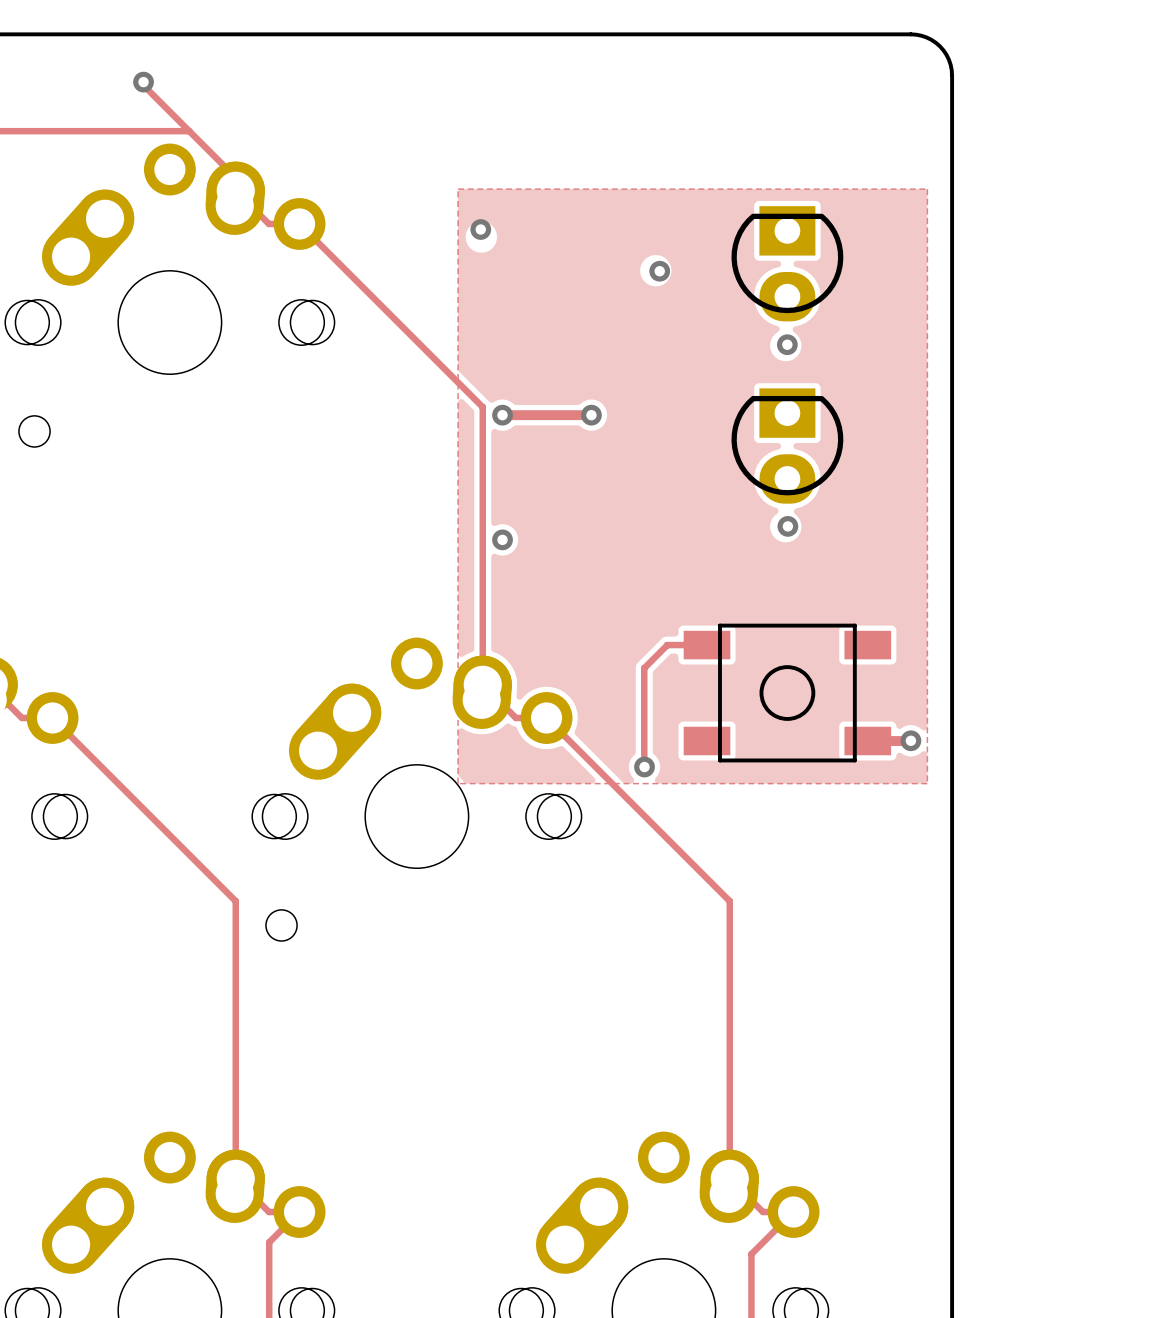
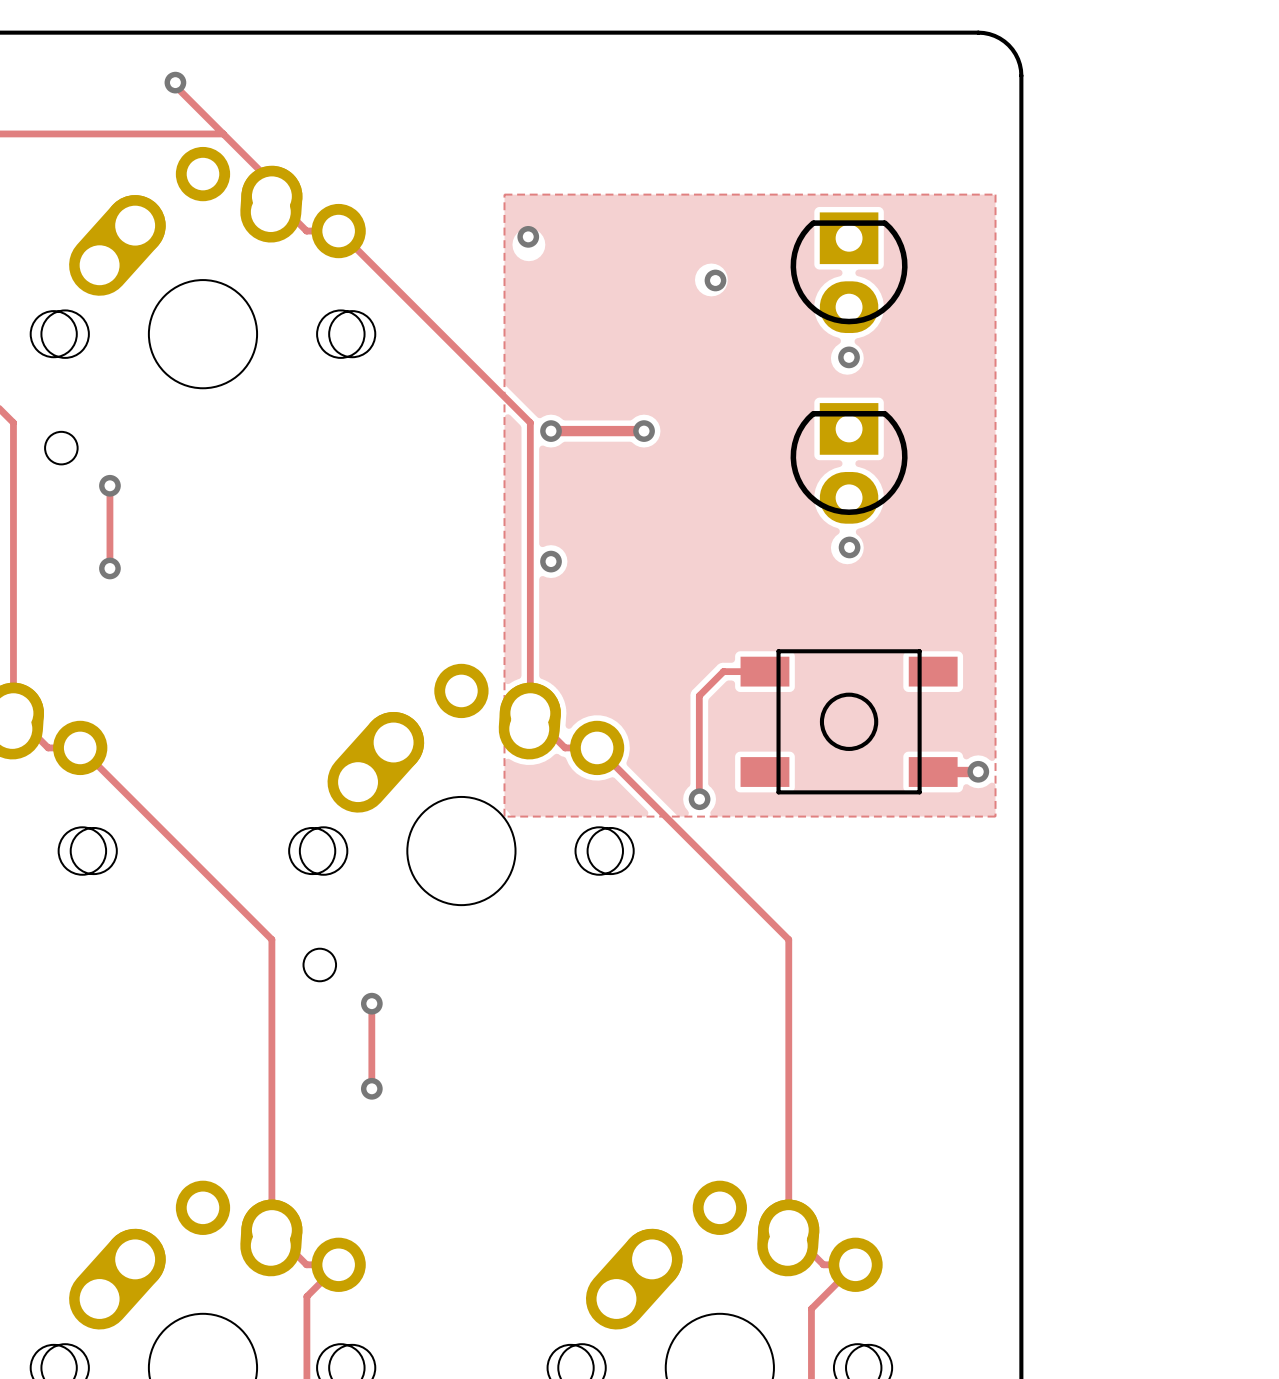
track: none -> (109, 485) (109, 568)
via: none -> (109, 485)
via: none -> (109, 568)
track: none -> (371, 1003) (371, 1088)
via: none -> (371, 1003)
via: none -> (371, 1088)

